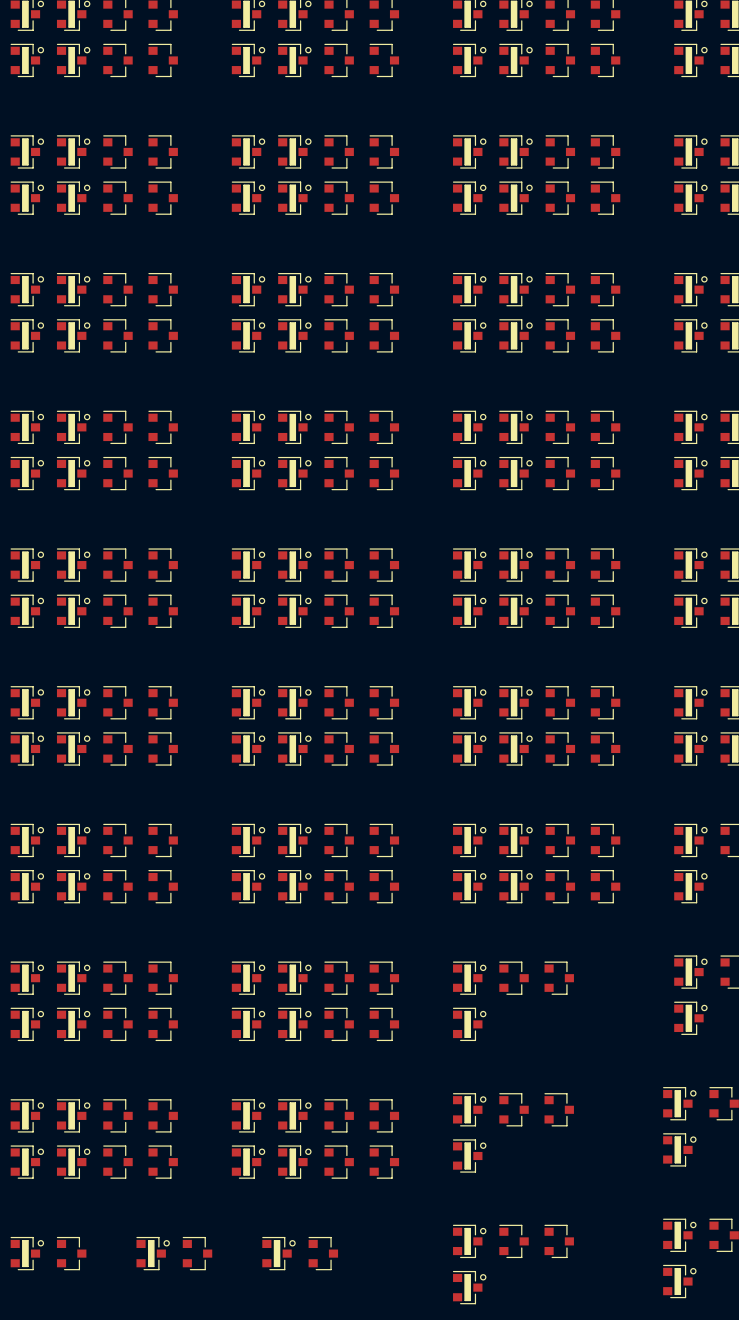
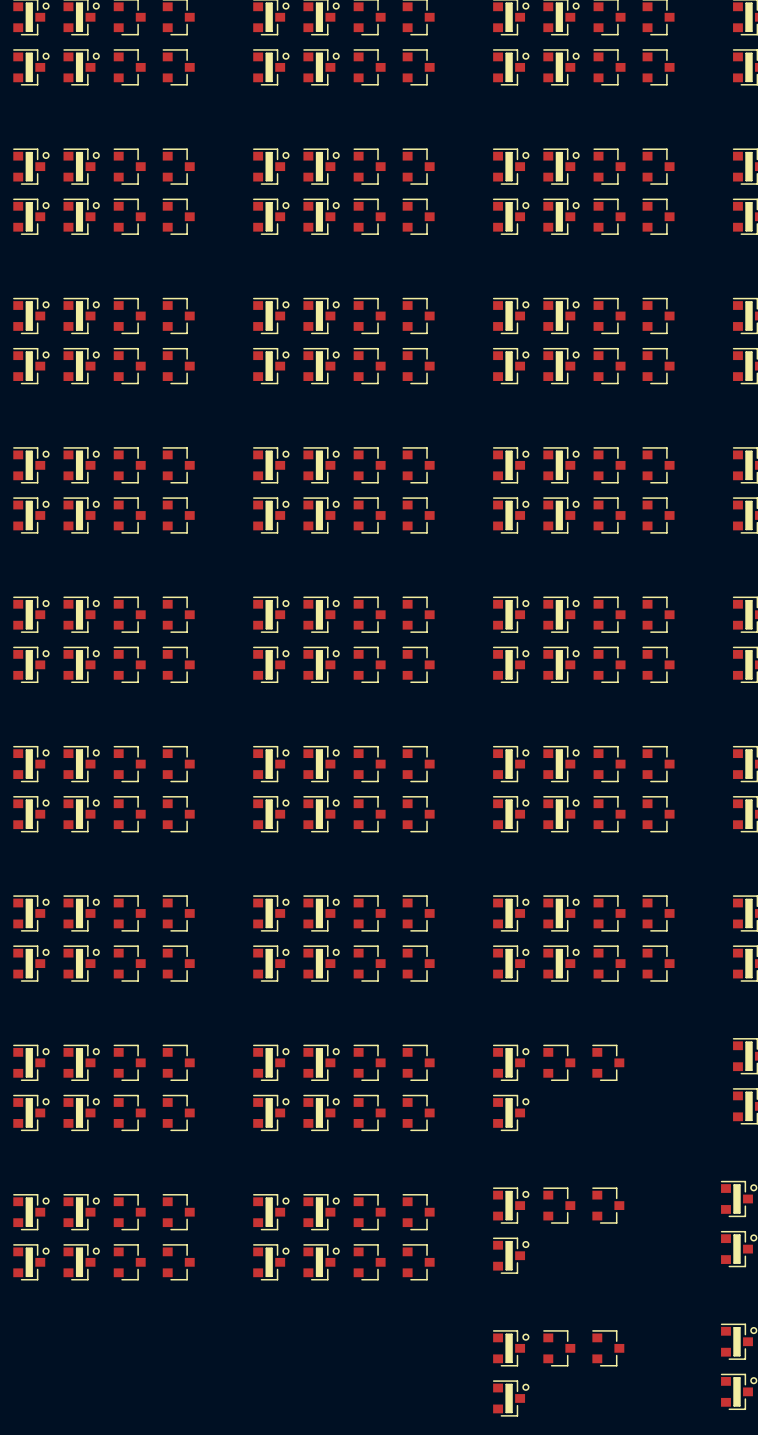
part: (27, 1253) -> none
part: (71, 1253) -> none
part: (153, 1253) -> none
part: (197, 1253) -> none
part: (278, 1253) -> none
part: (323, 1253) -> none

